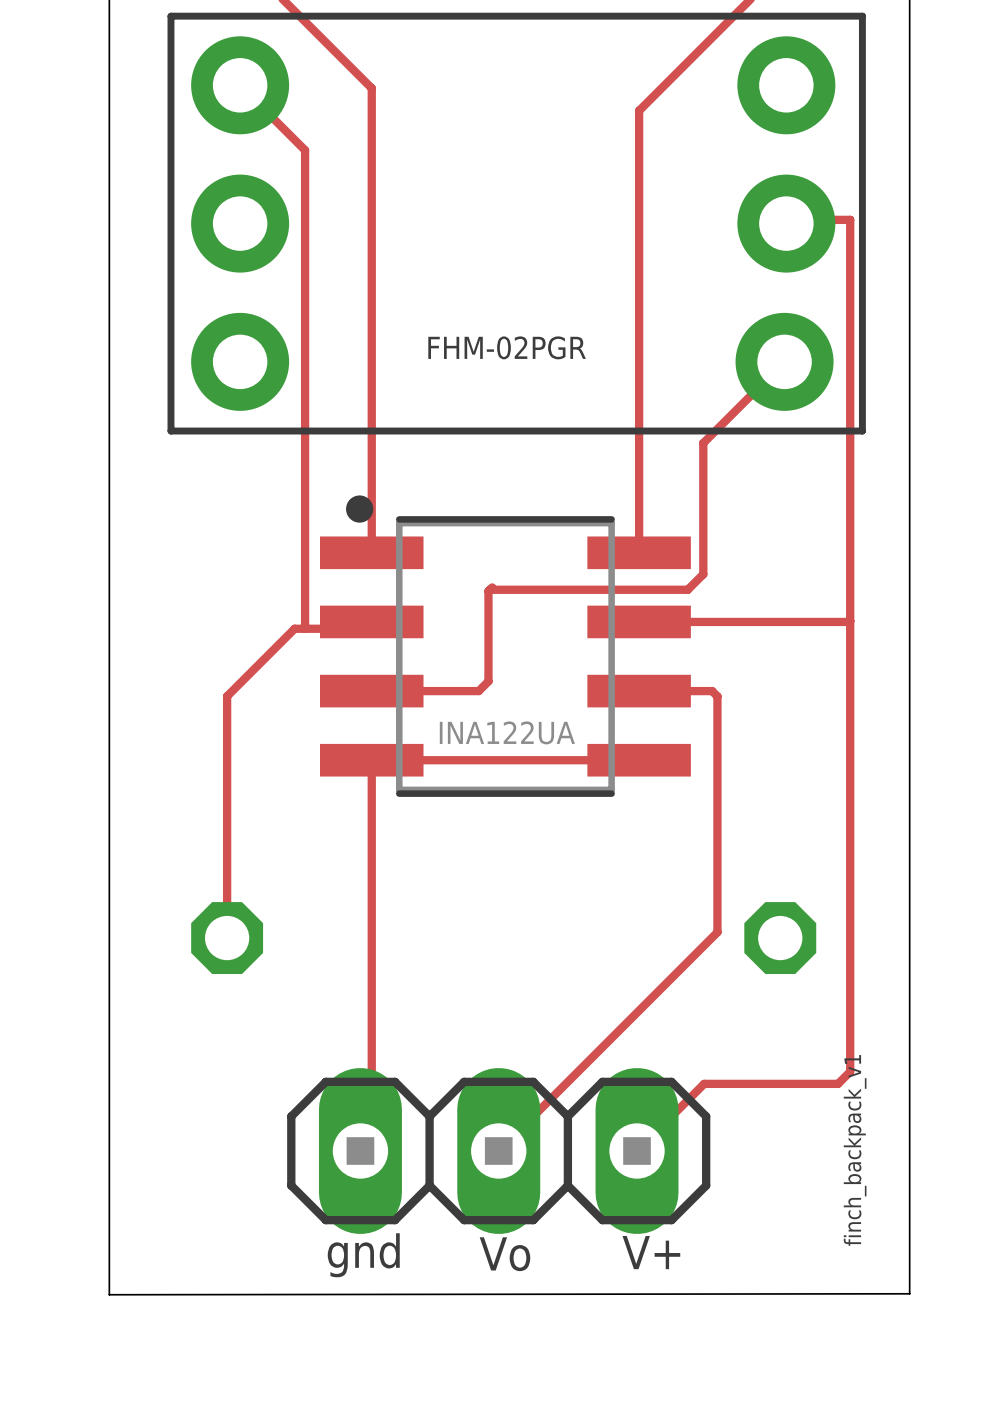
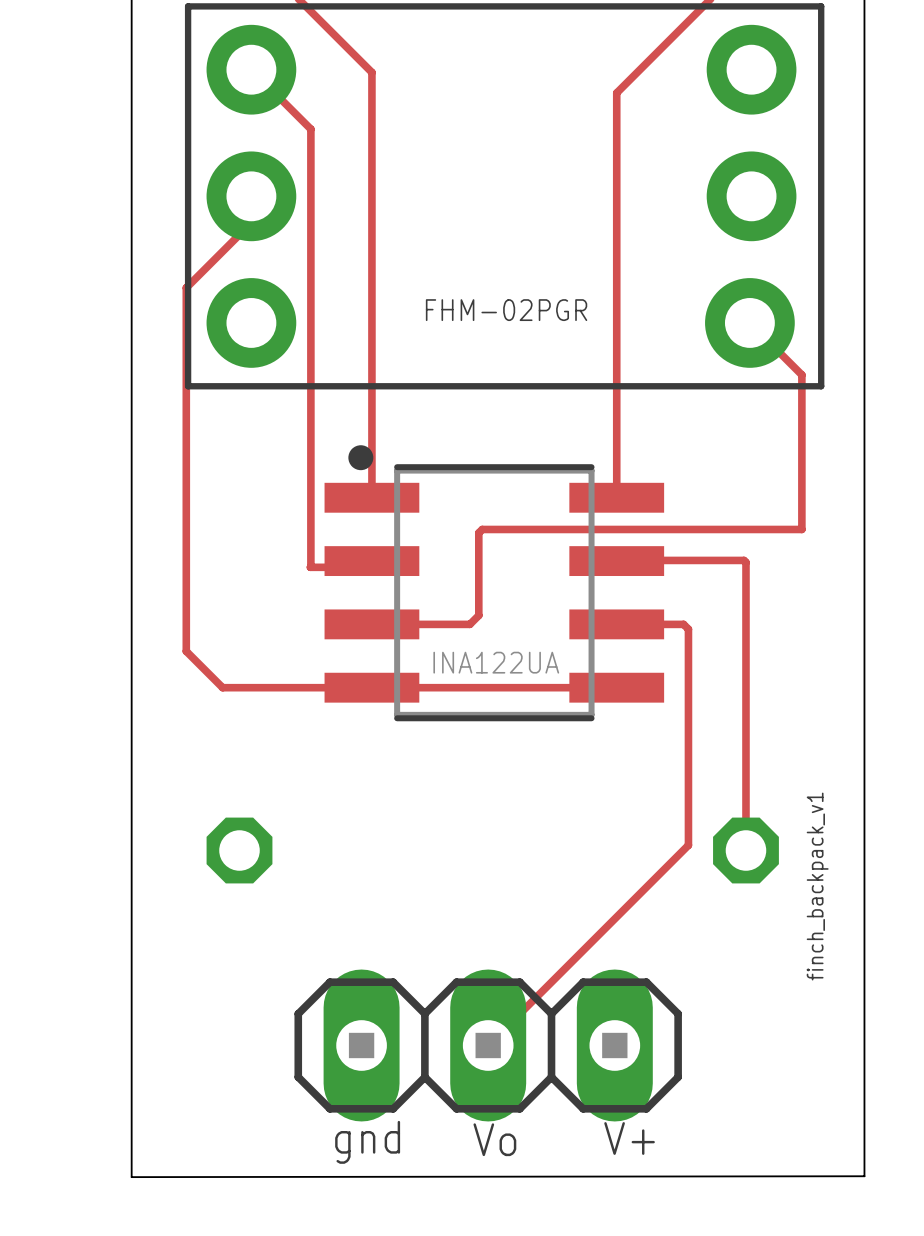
track: (786, 223) (790, 219) (850, 219) (850, 1071) (838, 1083) (704, 1083) (637, 1151) -> none
track: (784, 361) (703, 443) (703, 574) (687, 589) (489, 589) -> (749, 322) (801, 374) (801, 529) (482, 529)
track: (850, 621) (639, 621) -> (745, 850) (745, 562) (744, 560) (617, 560)
track: (304, 628) (294, 628) (227, 696) (227, 938) -> none
track: (371, 760) (371, 1139) (360, 1151) -> (371, 687) (222, 687) (186, 651) (186, 287) (251, 222) (251, 196)
text position: finch_backpack_v1 (855, 1150) -> finch_backpack_v1 (817, 886)

